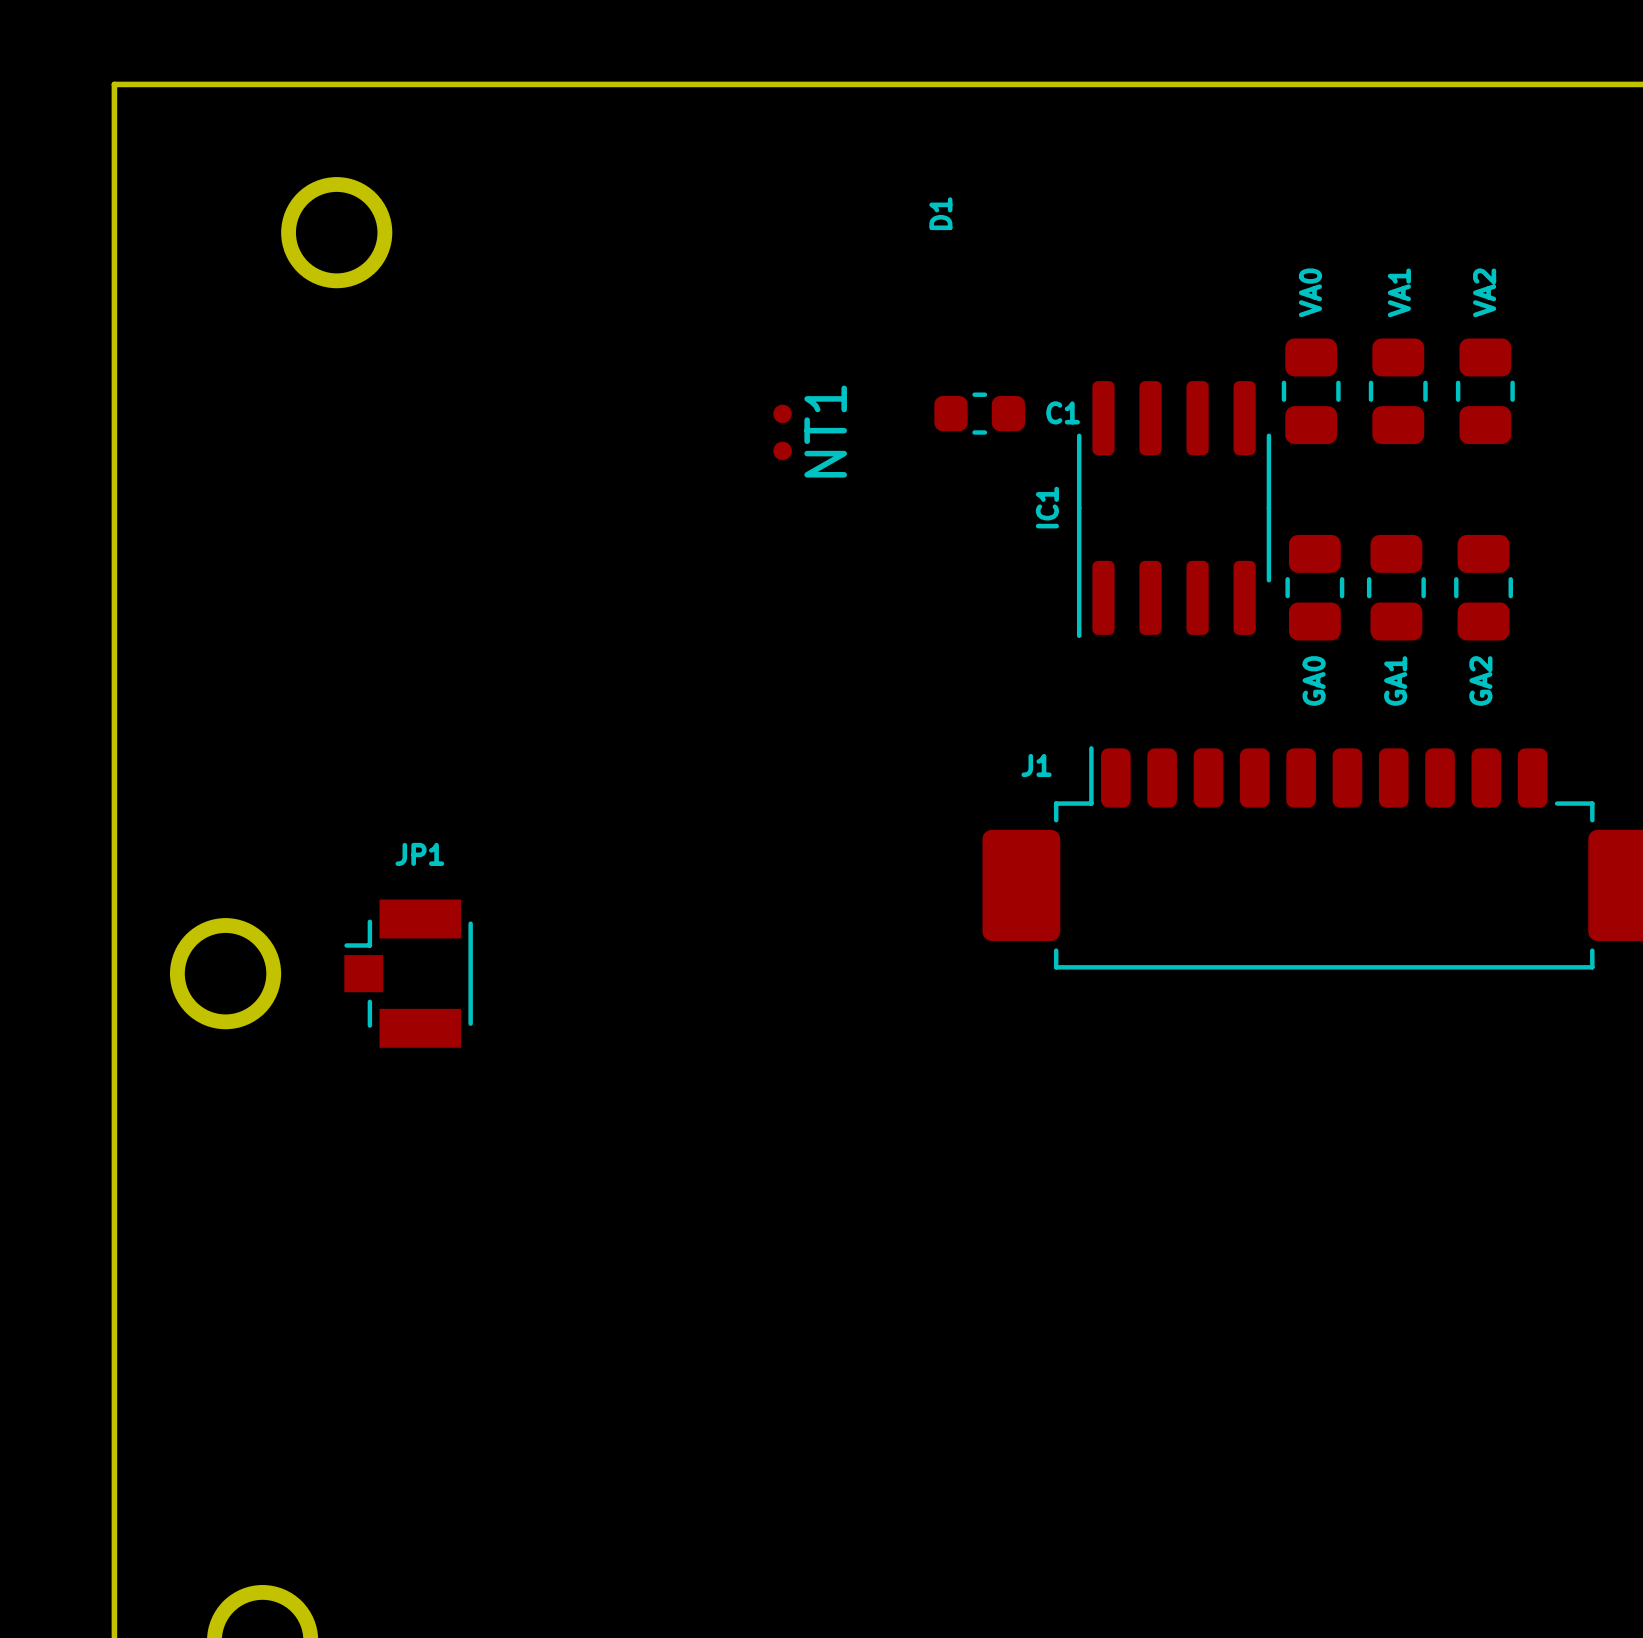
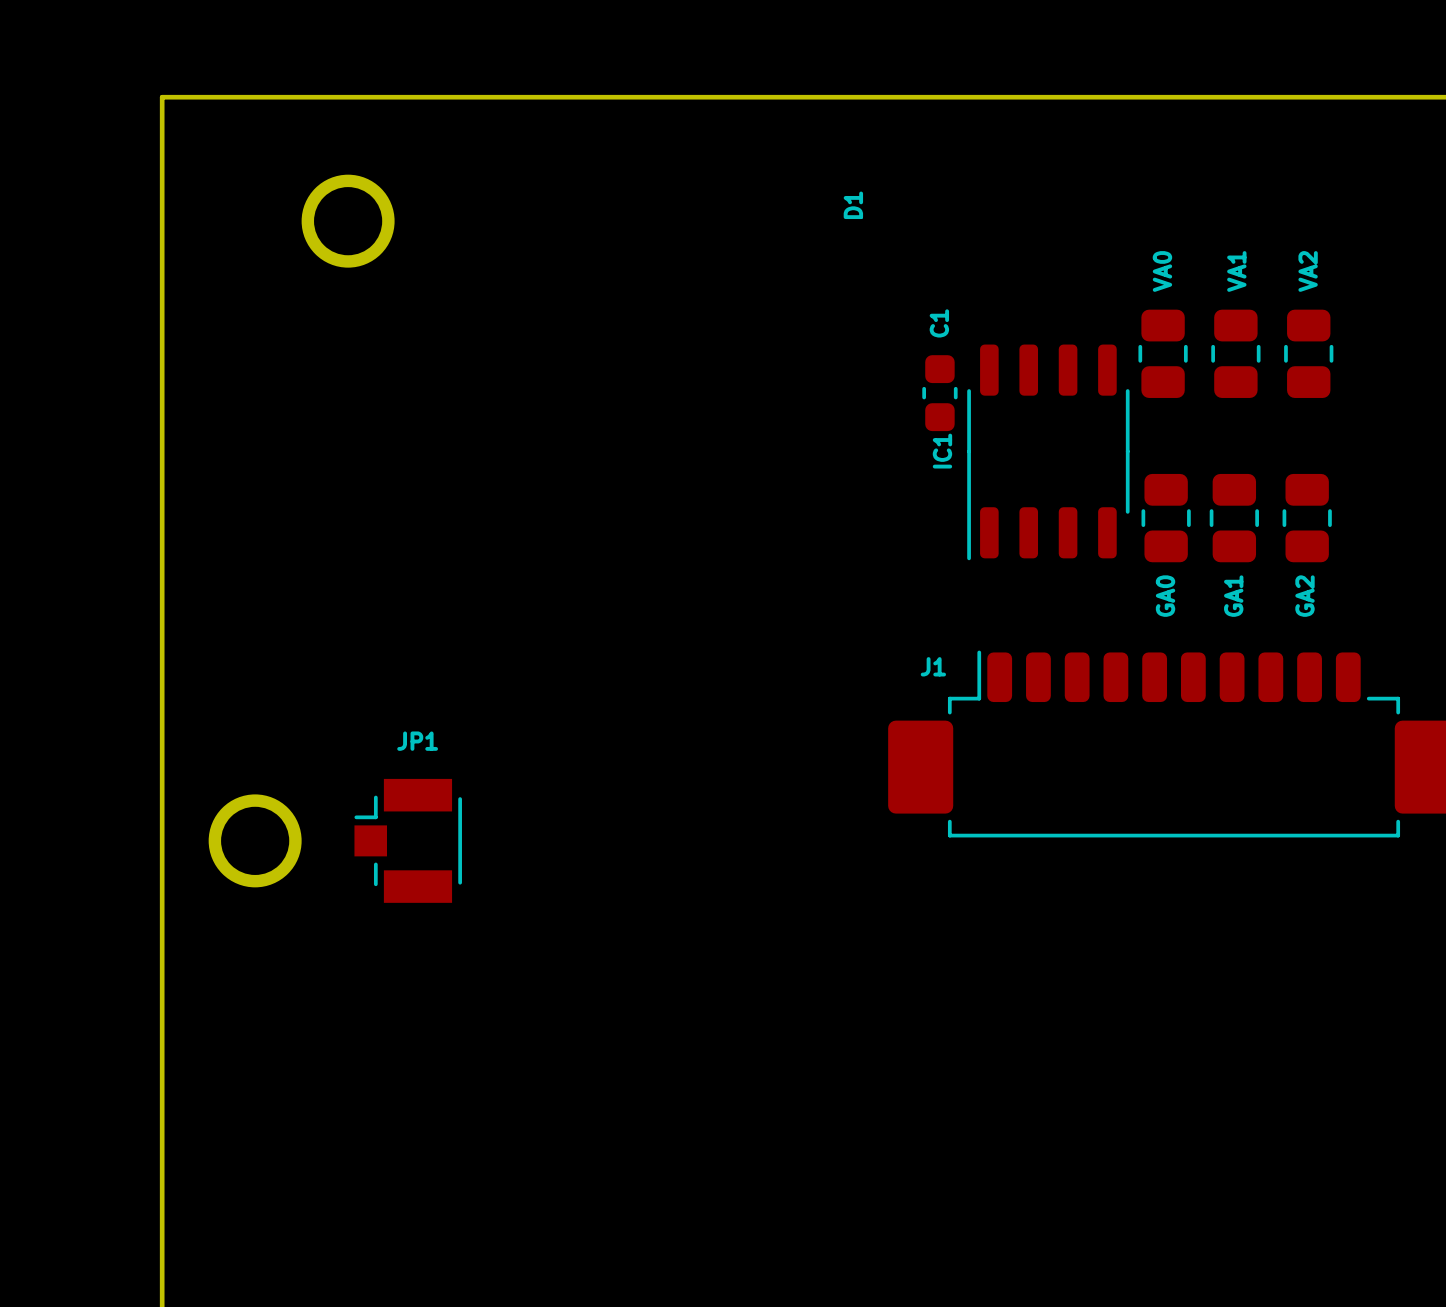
IC1 footprint: [1076, 381, 1272, 639] -> [967, 344, 1130, 561]
C1 name position: C1 (1063, 412) -> C1 (939, 323)
C1 rotation: 0° (979, 413) -> 90° clockwise (939, 393)
C1 position: (979, 413) -> (939, 393)
NT1: (782, 432) -> none

